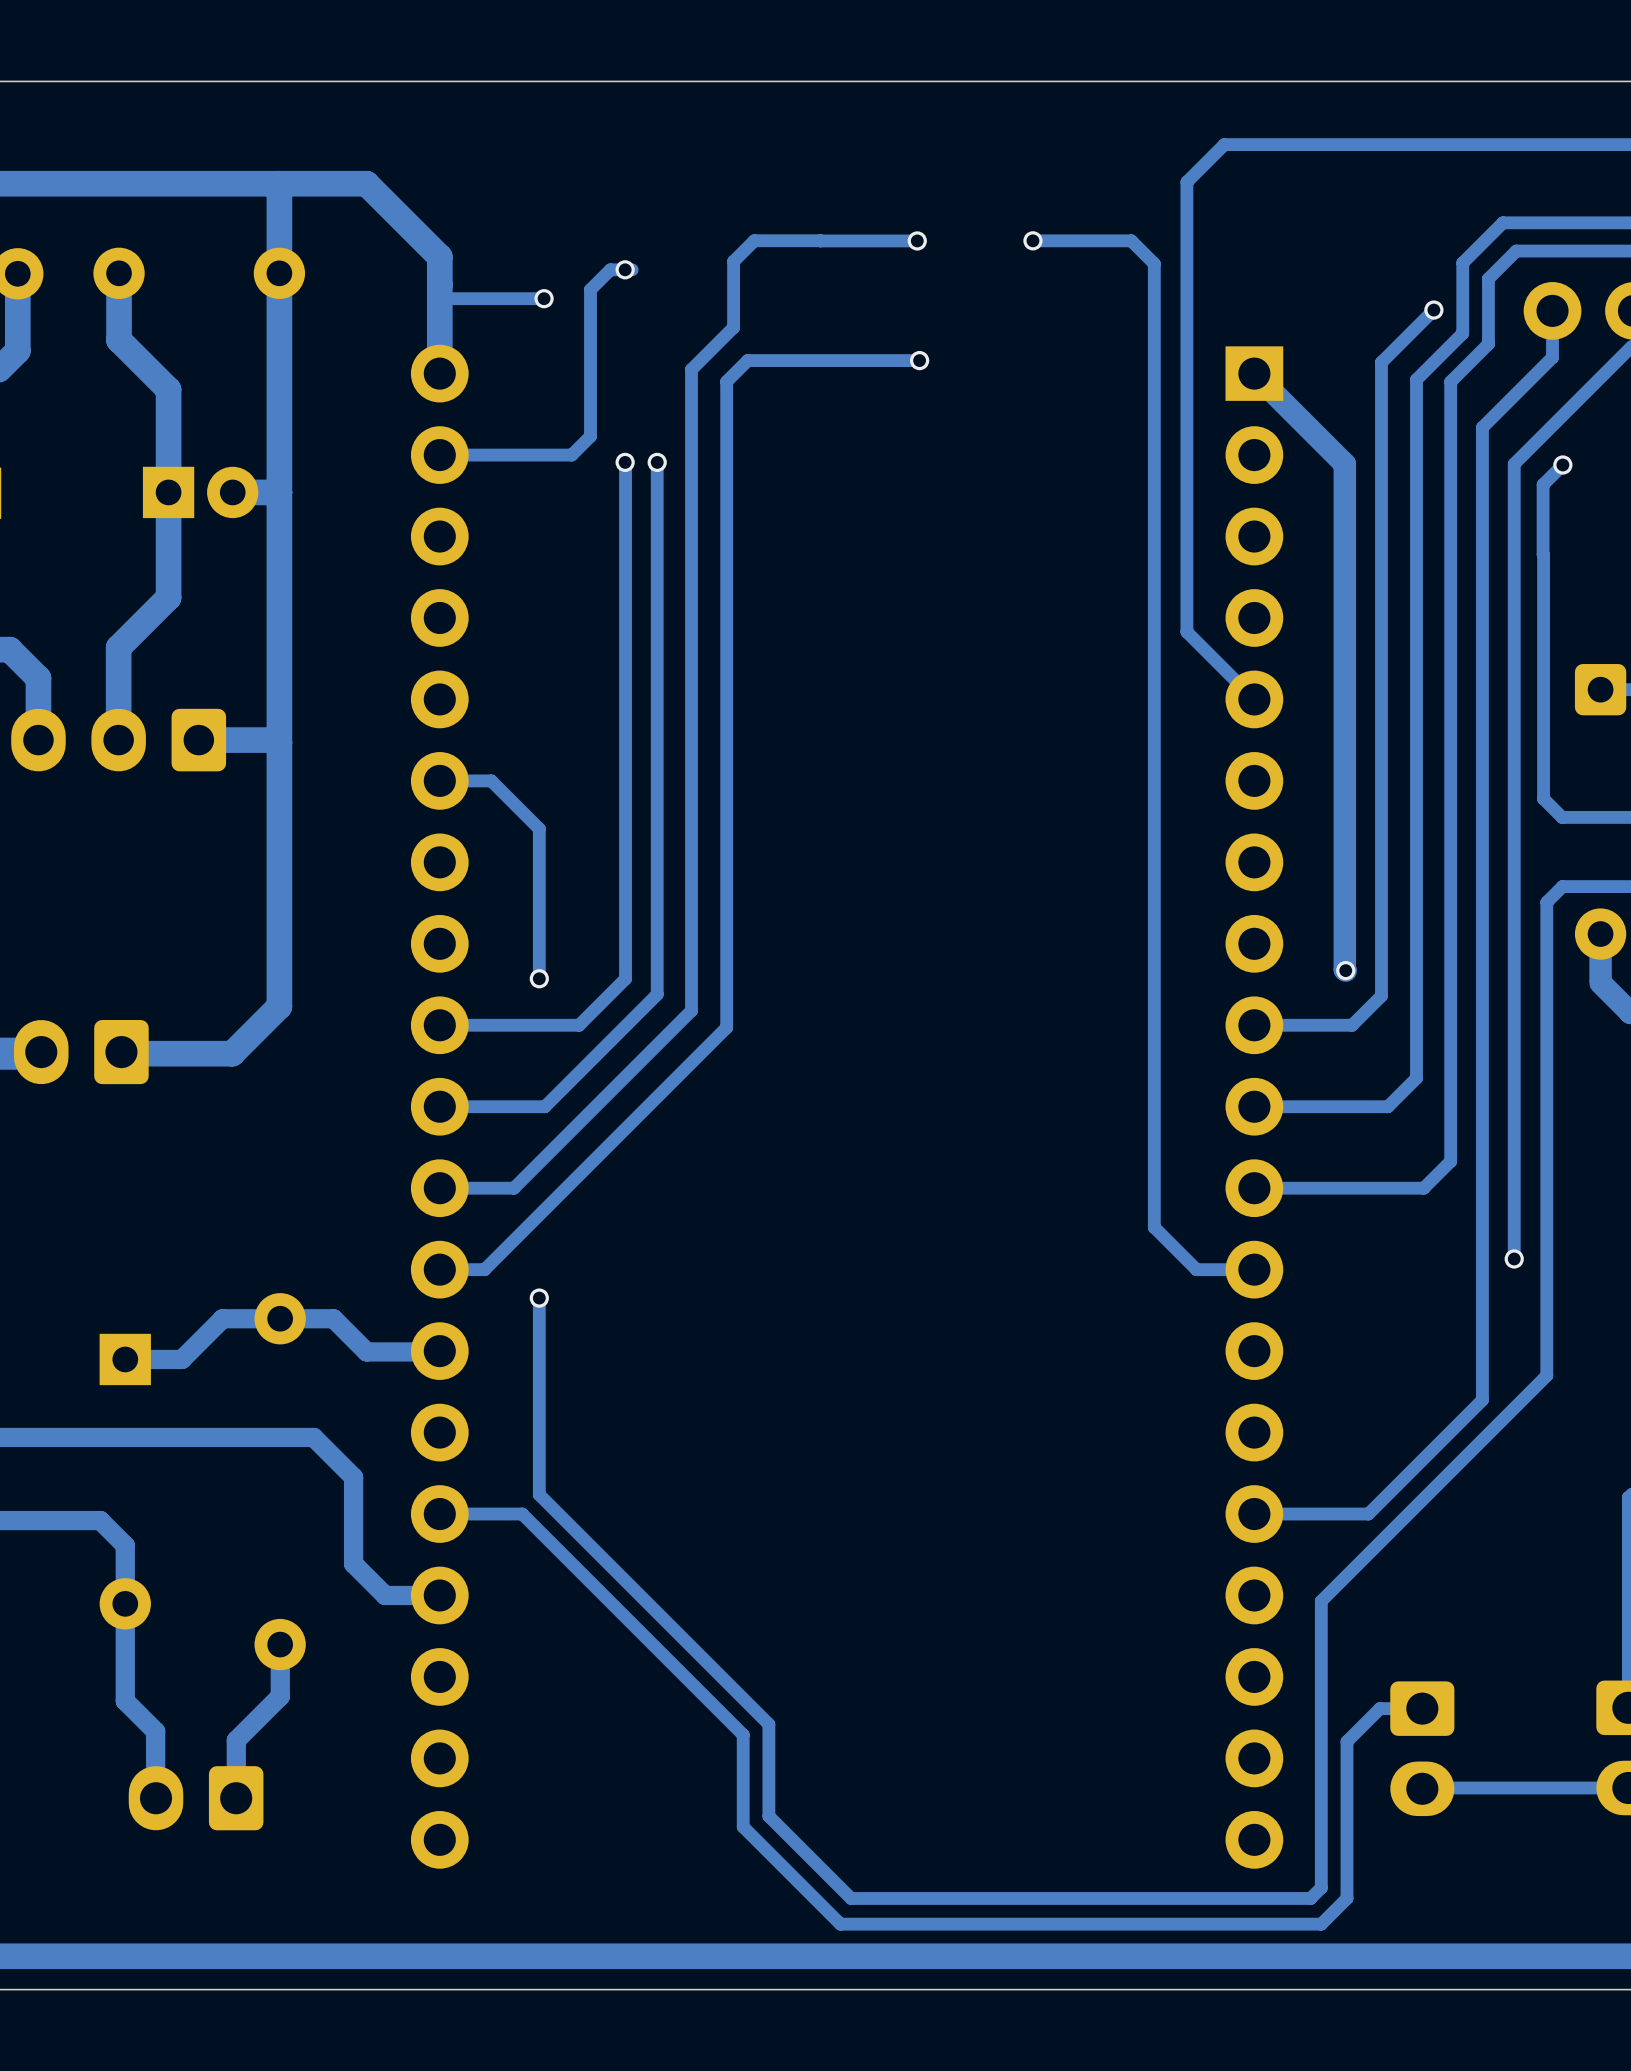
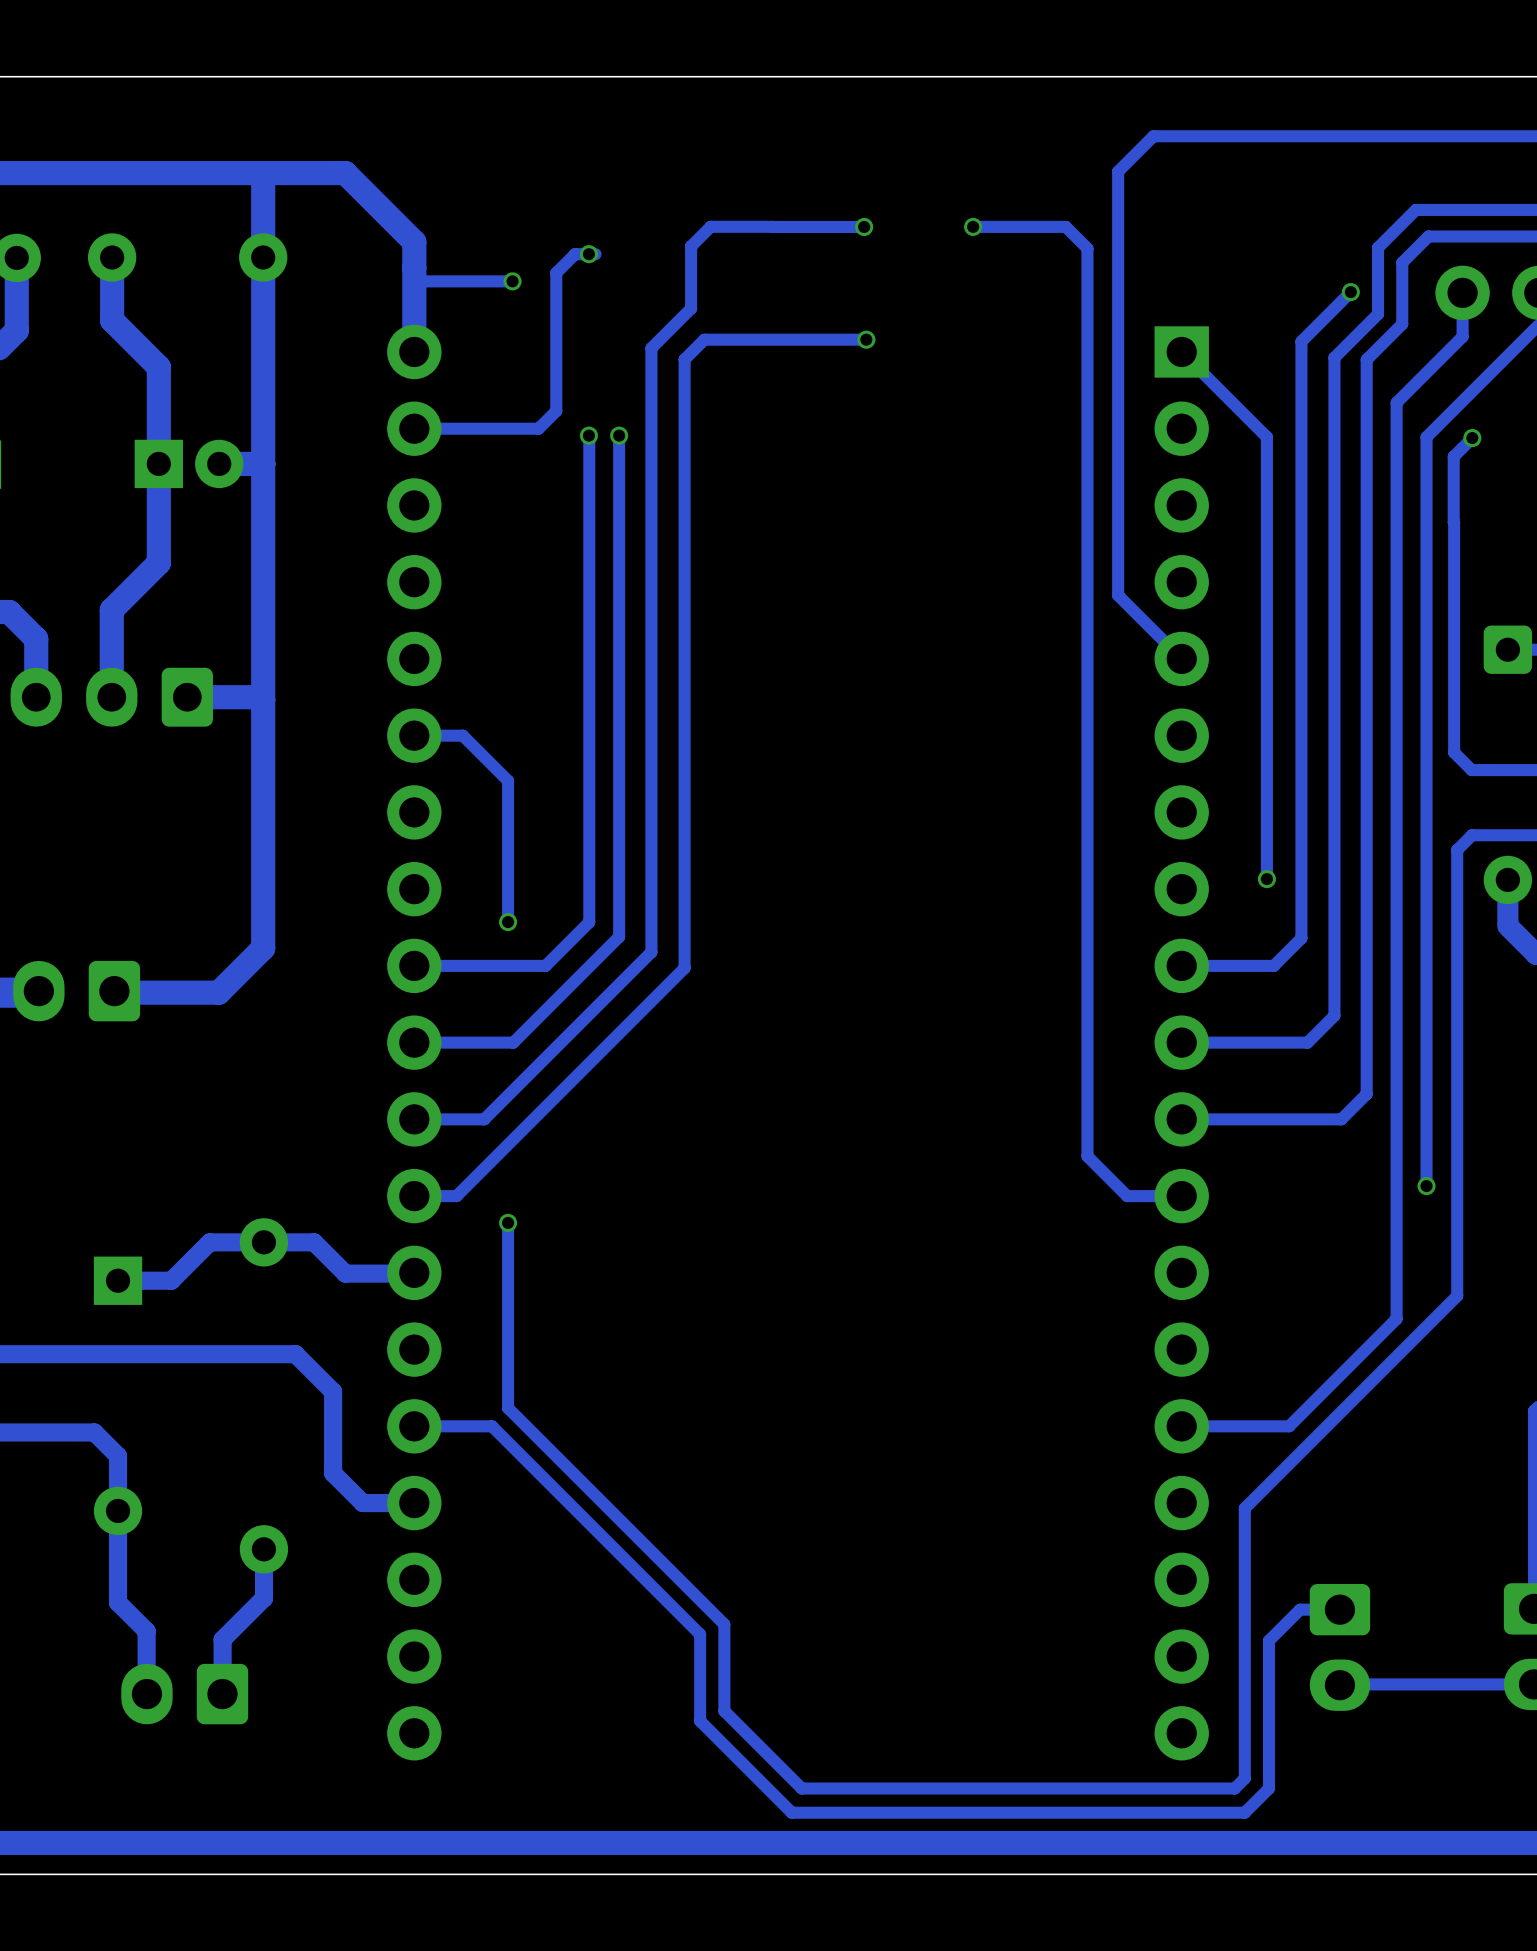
track width: thick (1254, 373) (1344, 464) (1344, 933) -> thin (1181, 351) (1266, 437) (1266, 879)
track: (1344, 933) (1345, 970) -> none
via position: (1345, 970) -> (1266, 879)

